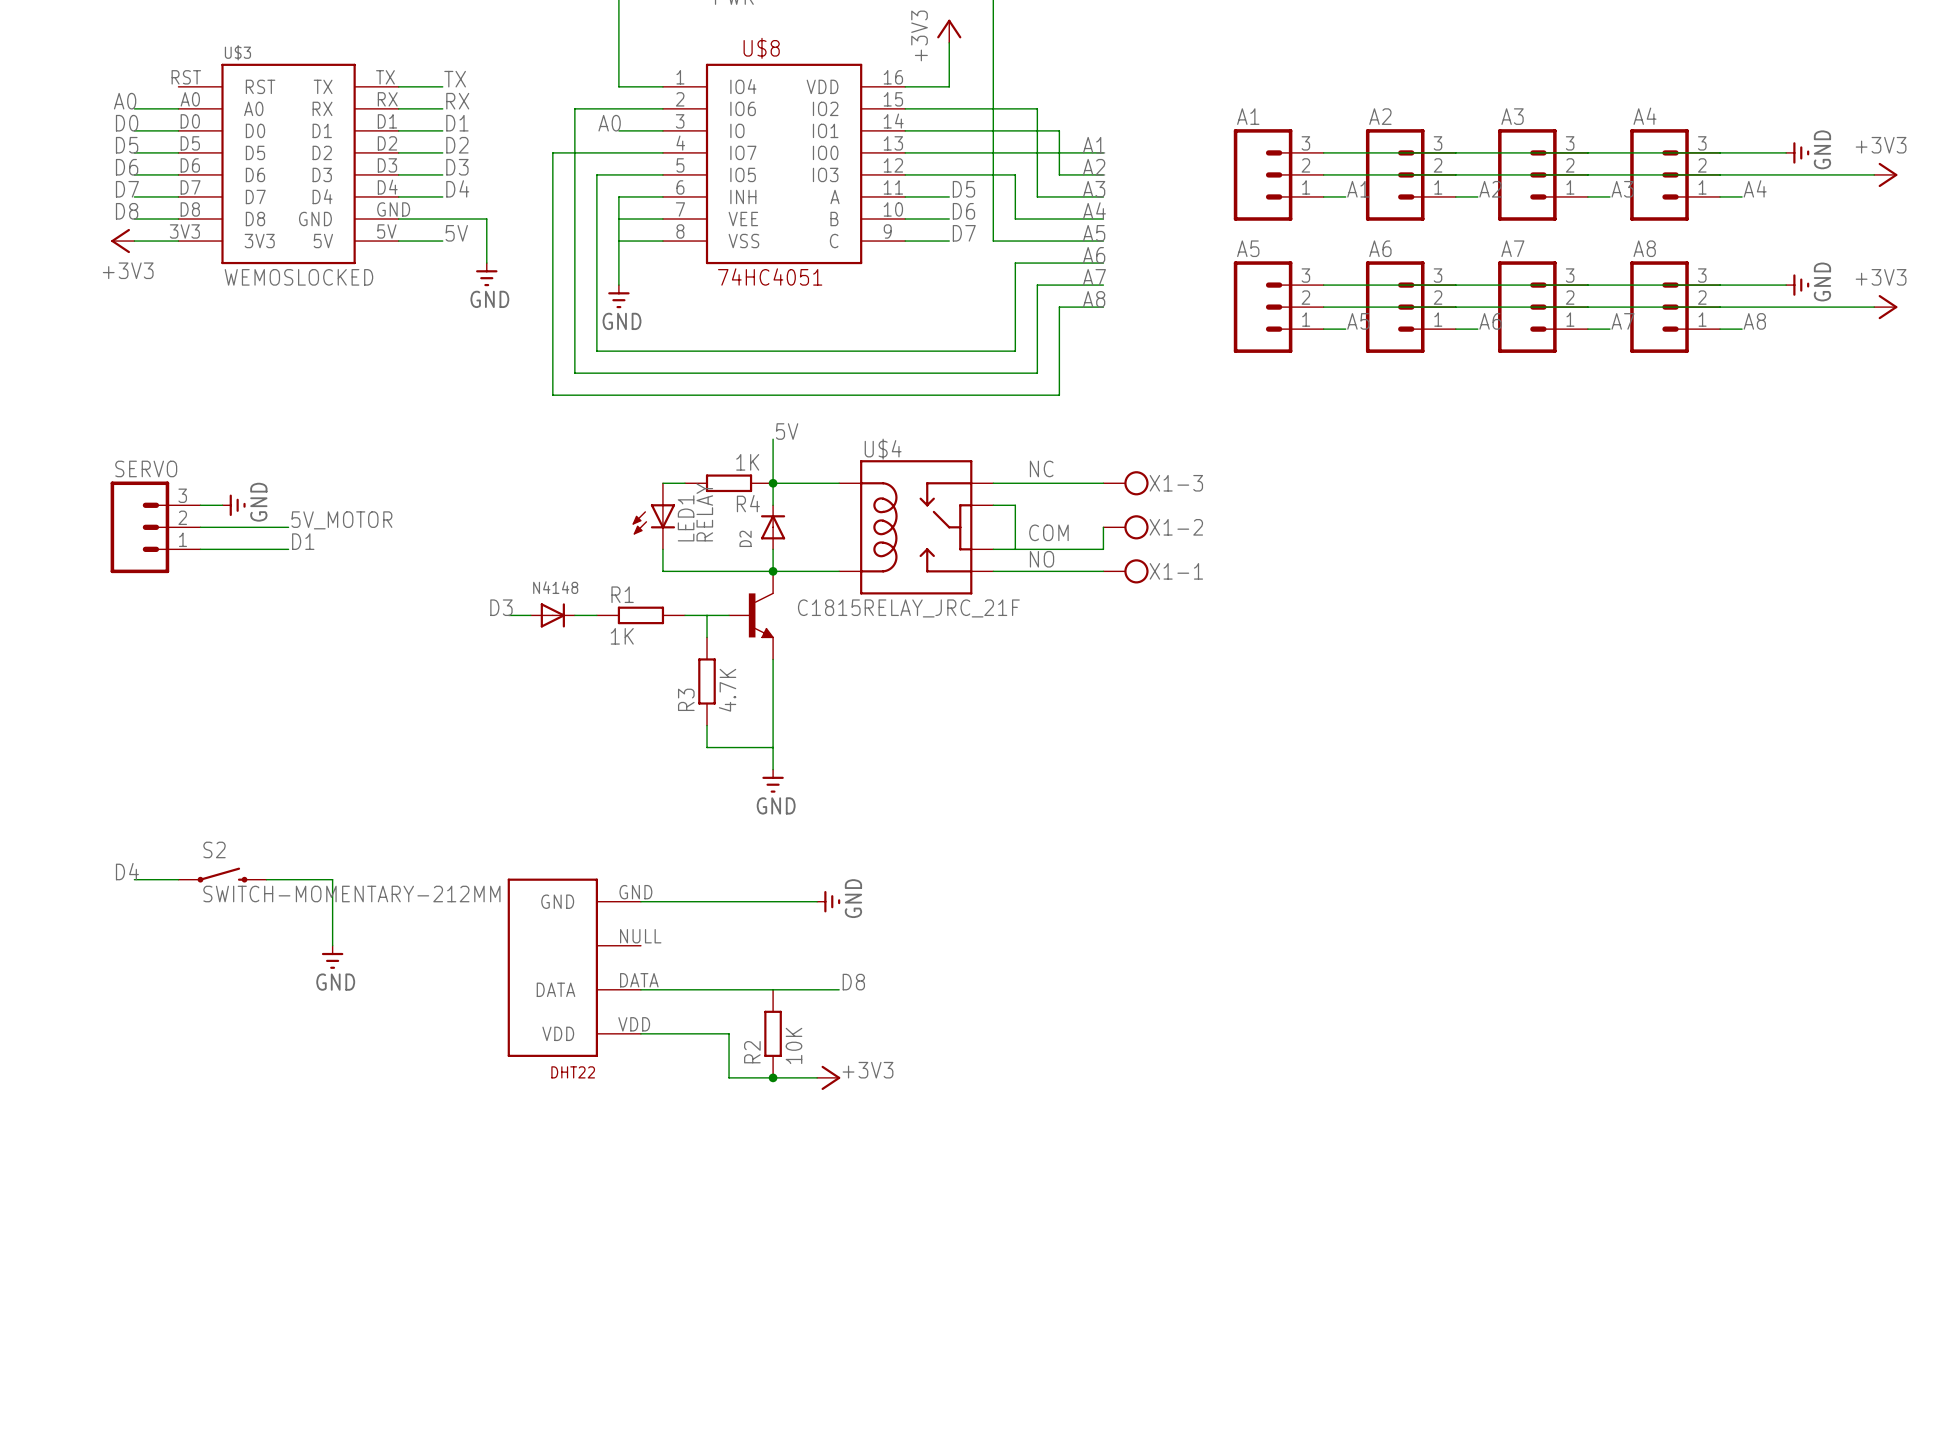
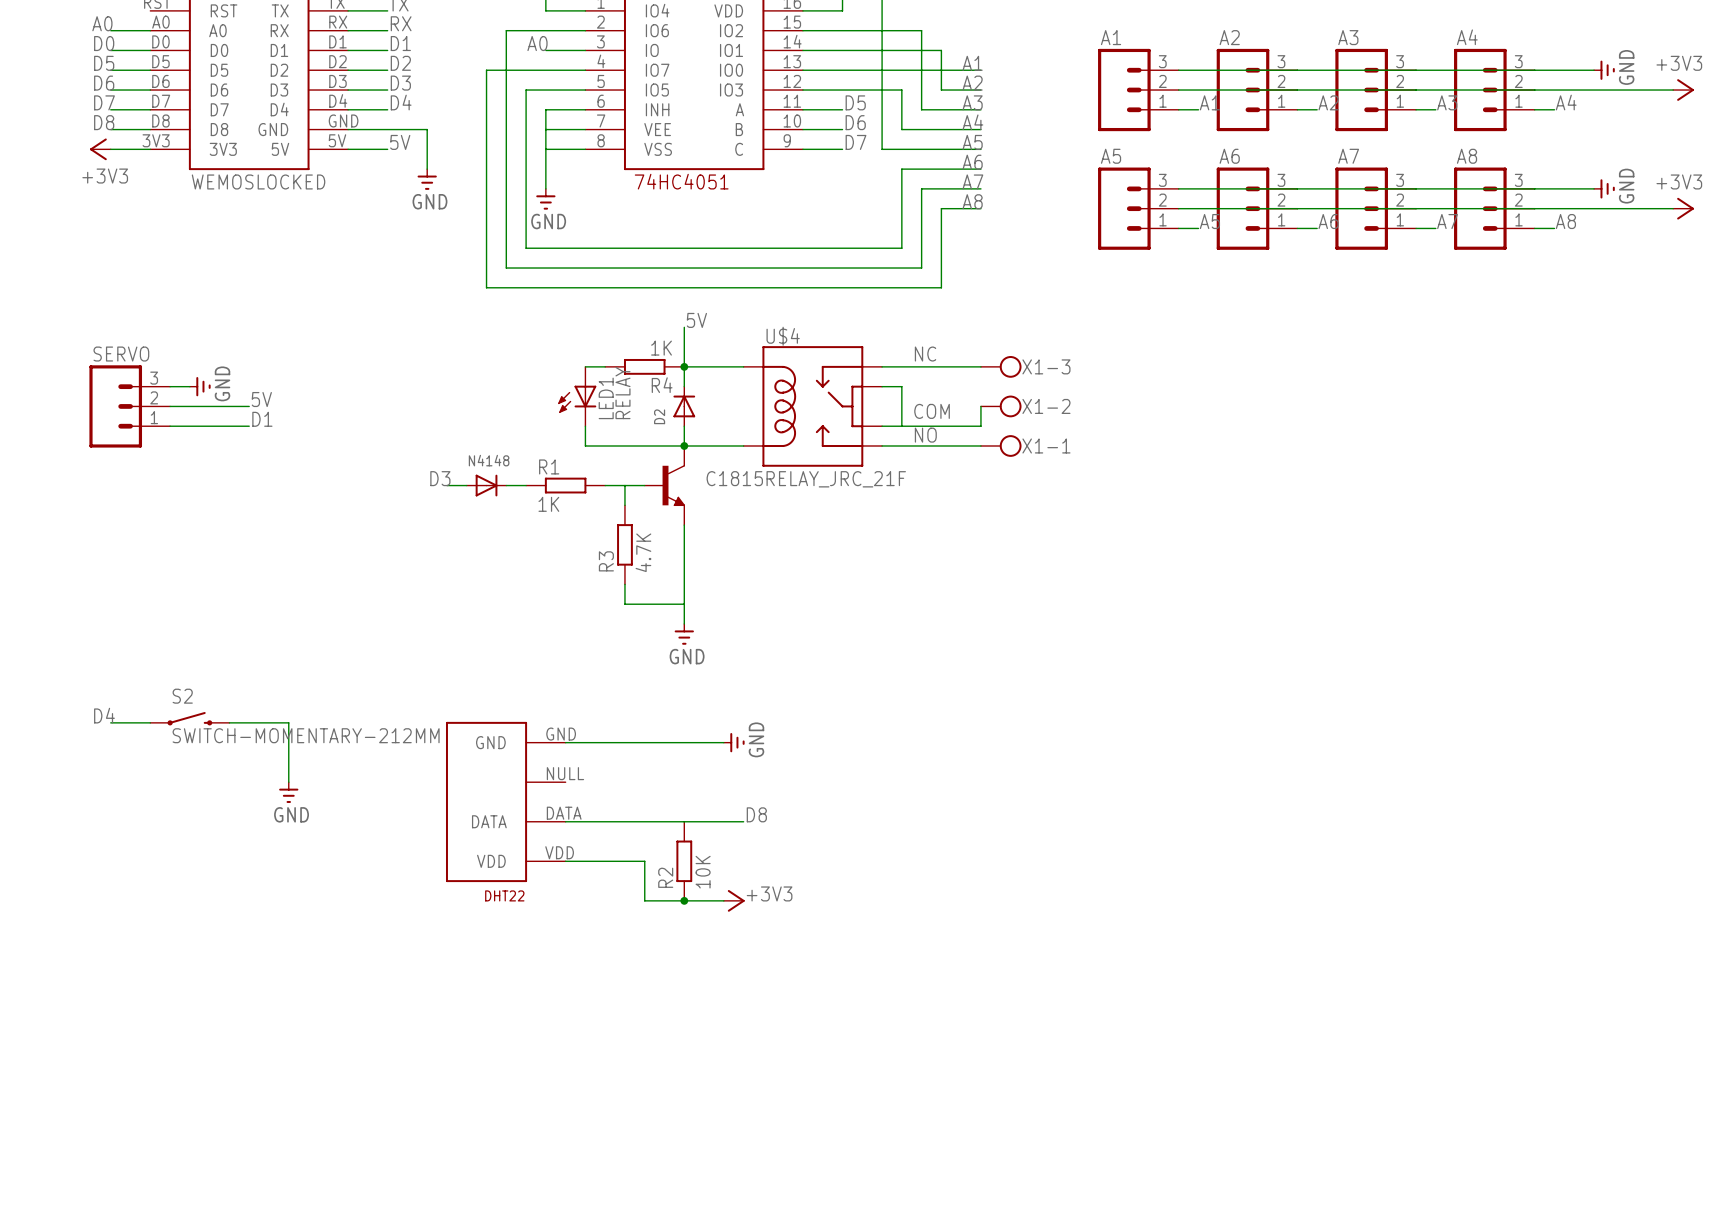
label: 5V_MOTOR (341, 520) -> 5V (261, 399)

